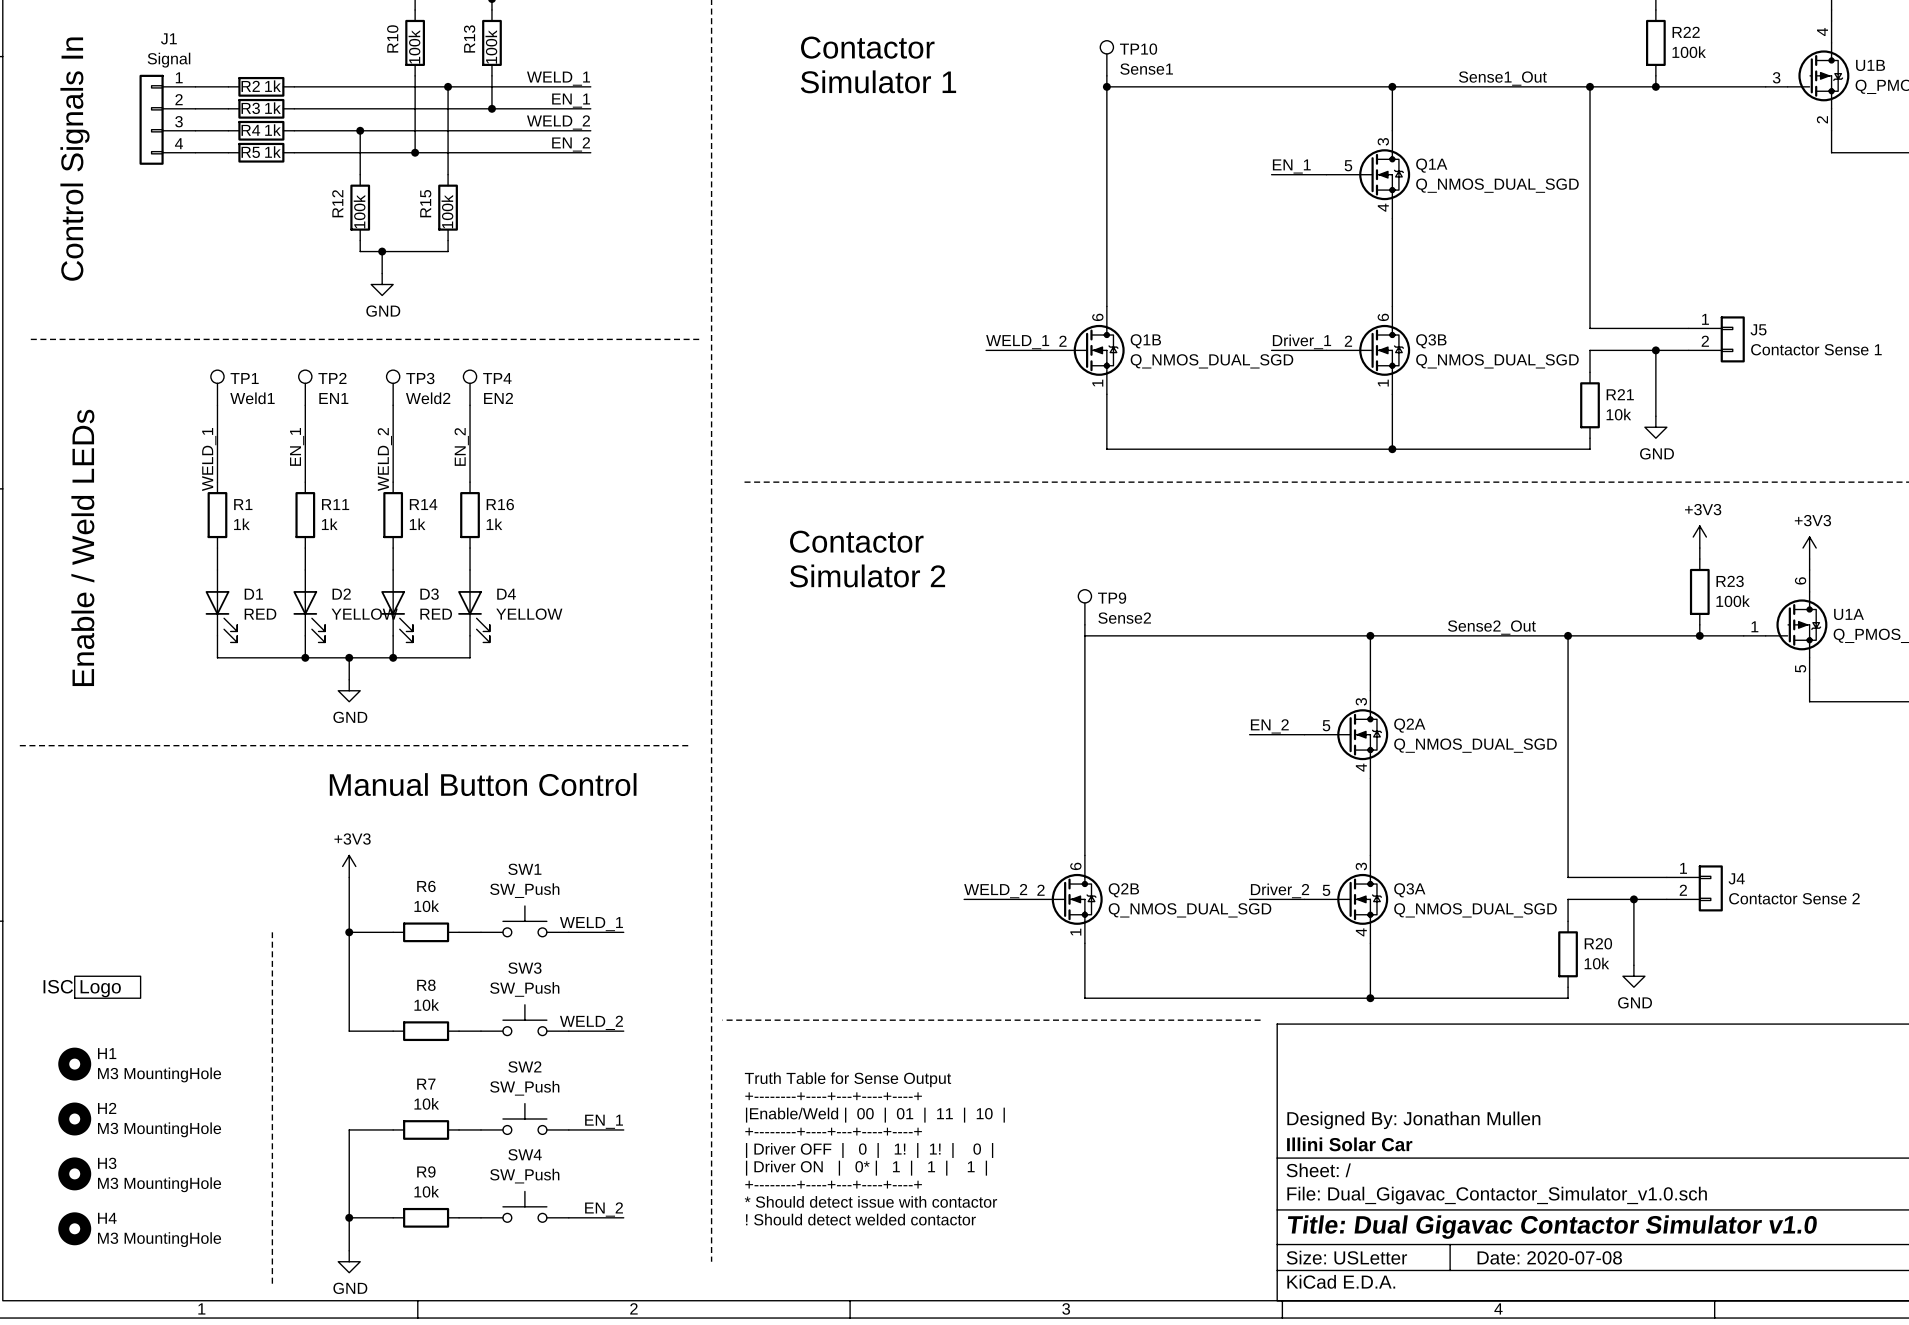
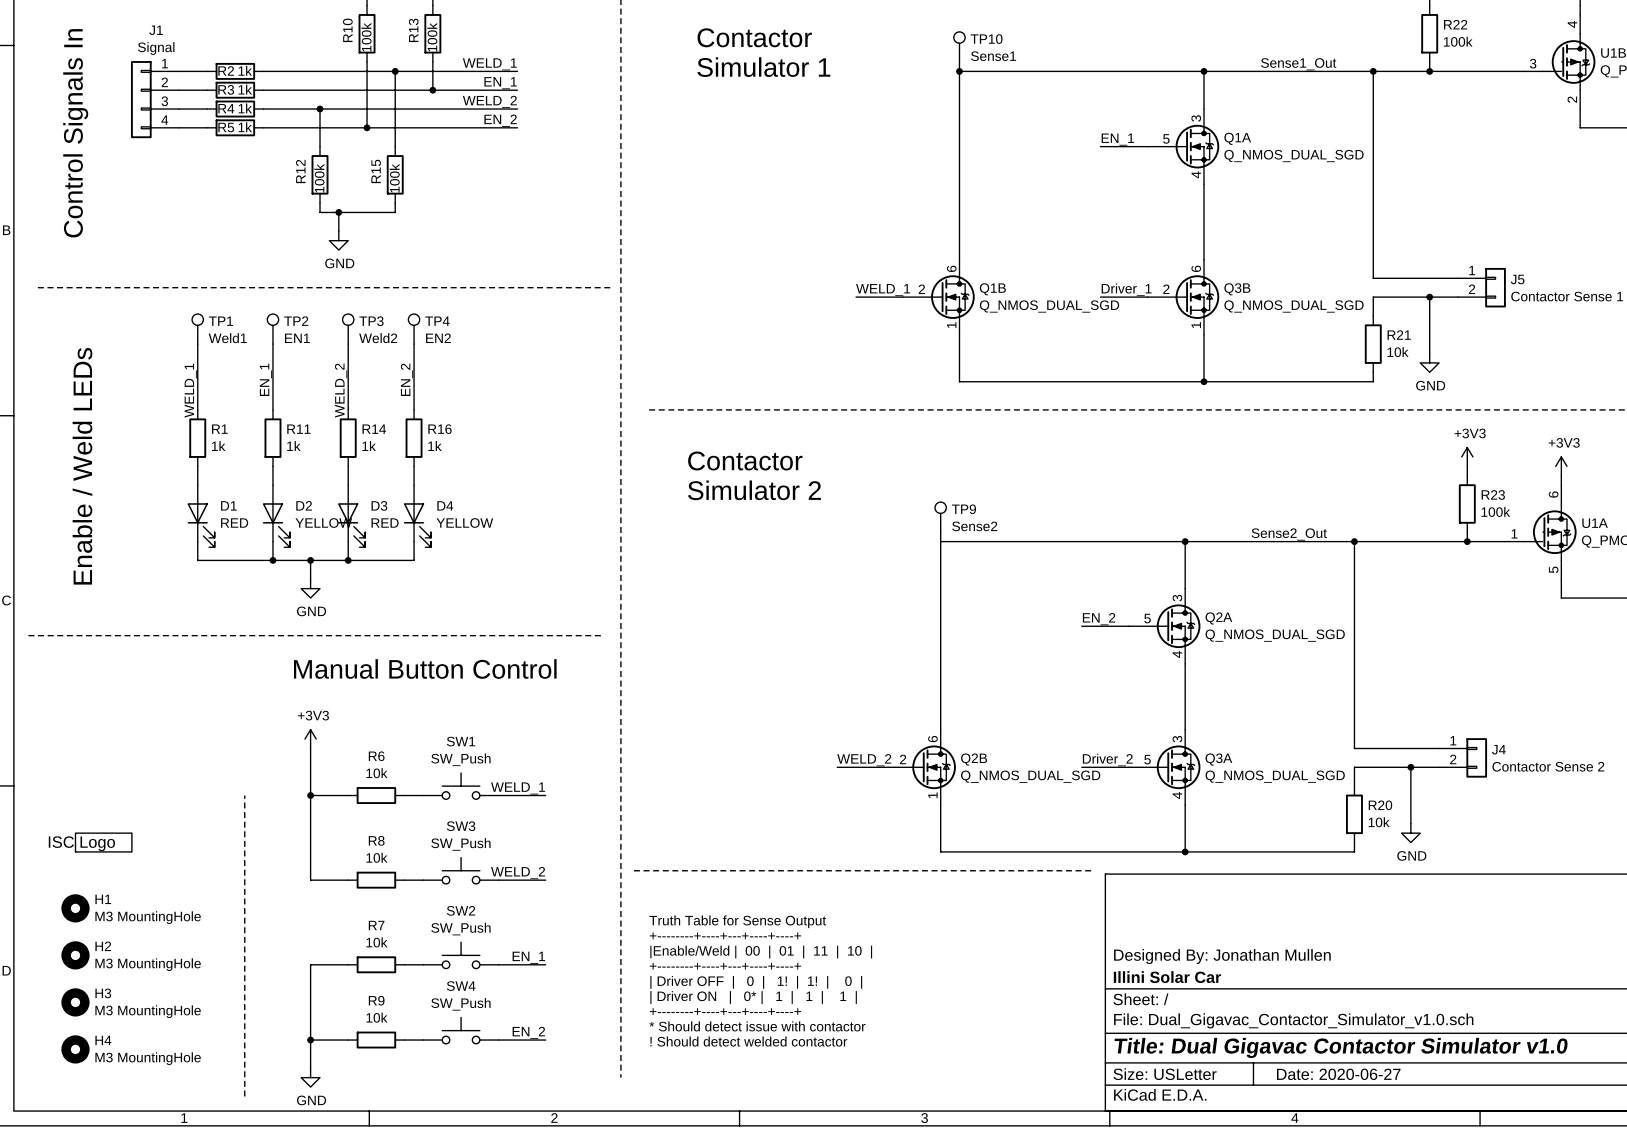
title block: Date: 2020-07-08 (1549, 1257) -> Date: 2020-06-27 (1338, 1074)

